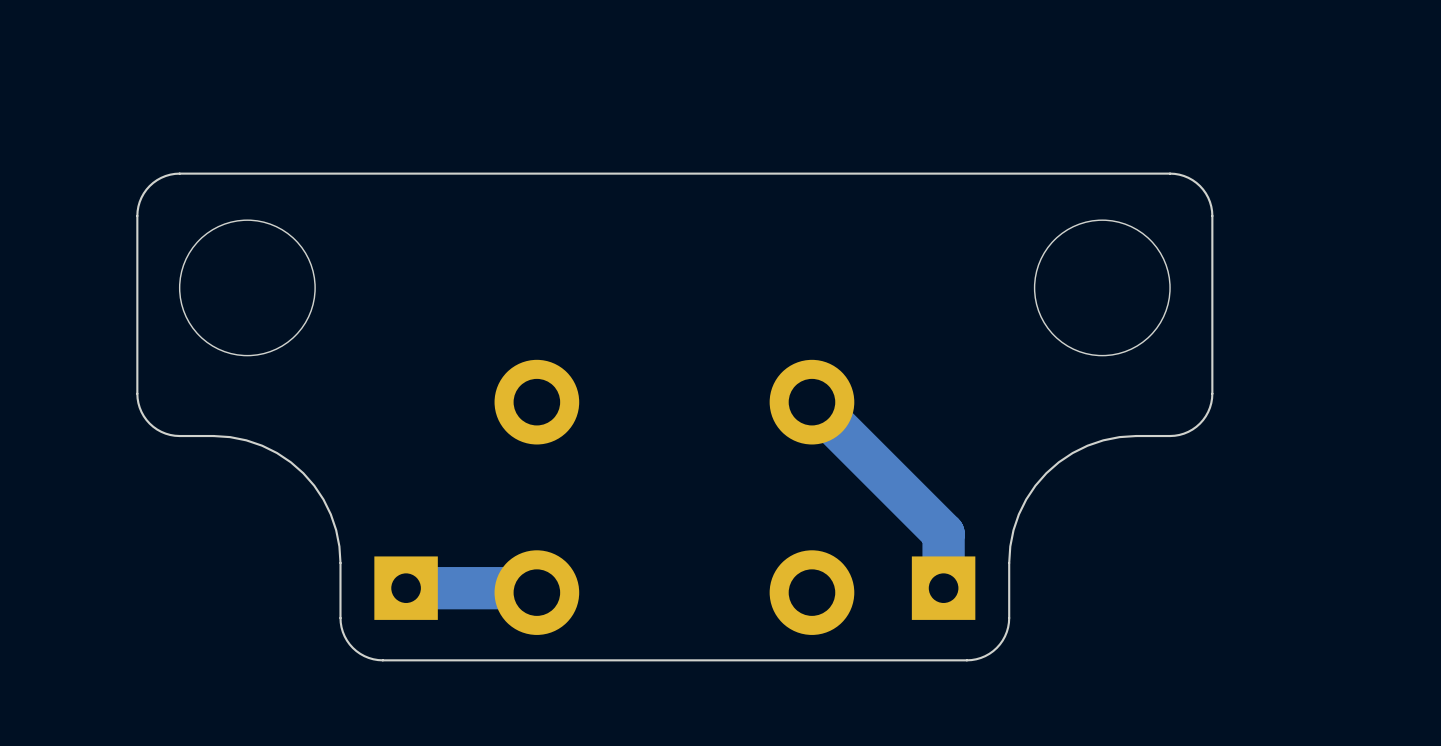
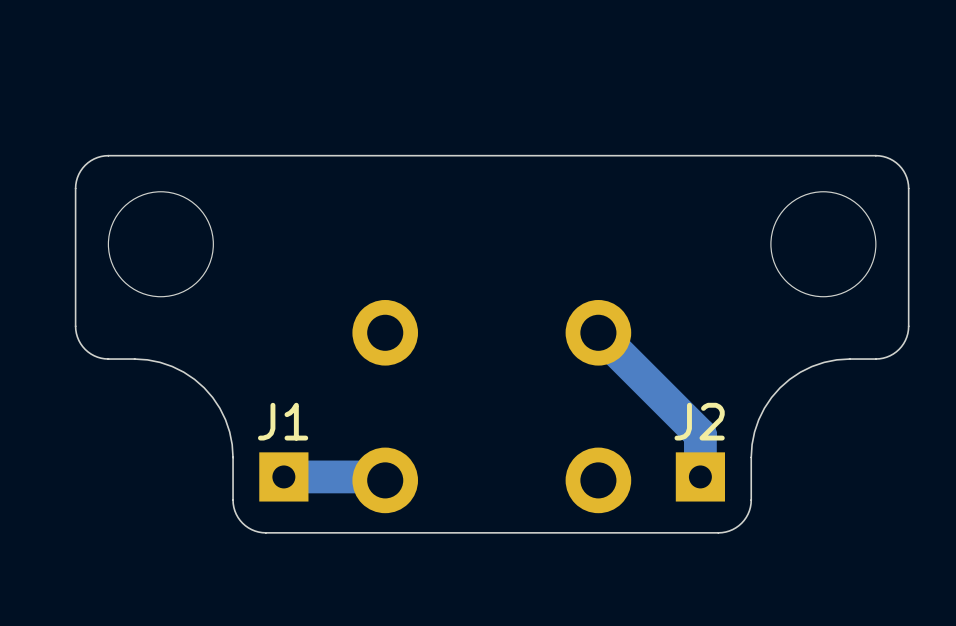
J1 name: none -> J1 (283, 421)
J2 name: none -> J2 (699, 421)

